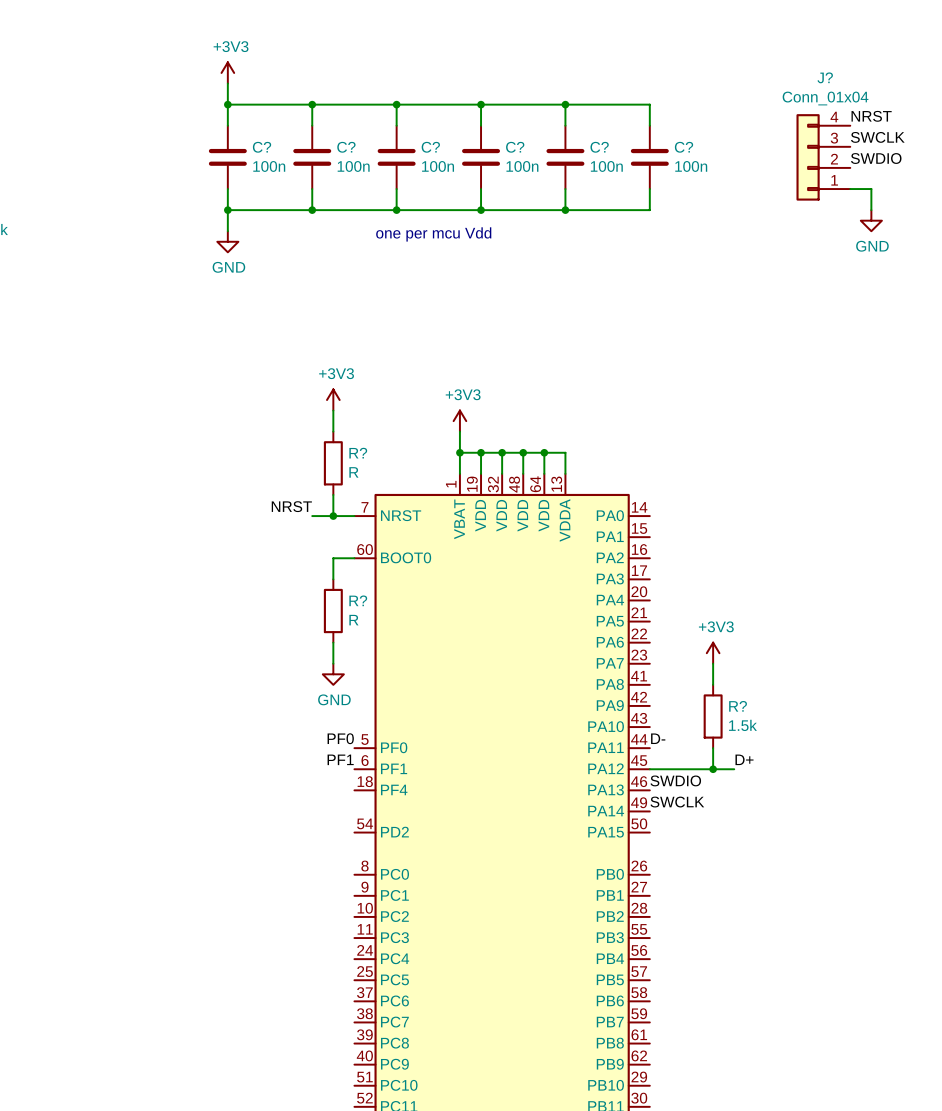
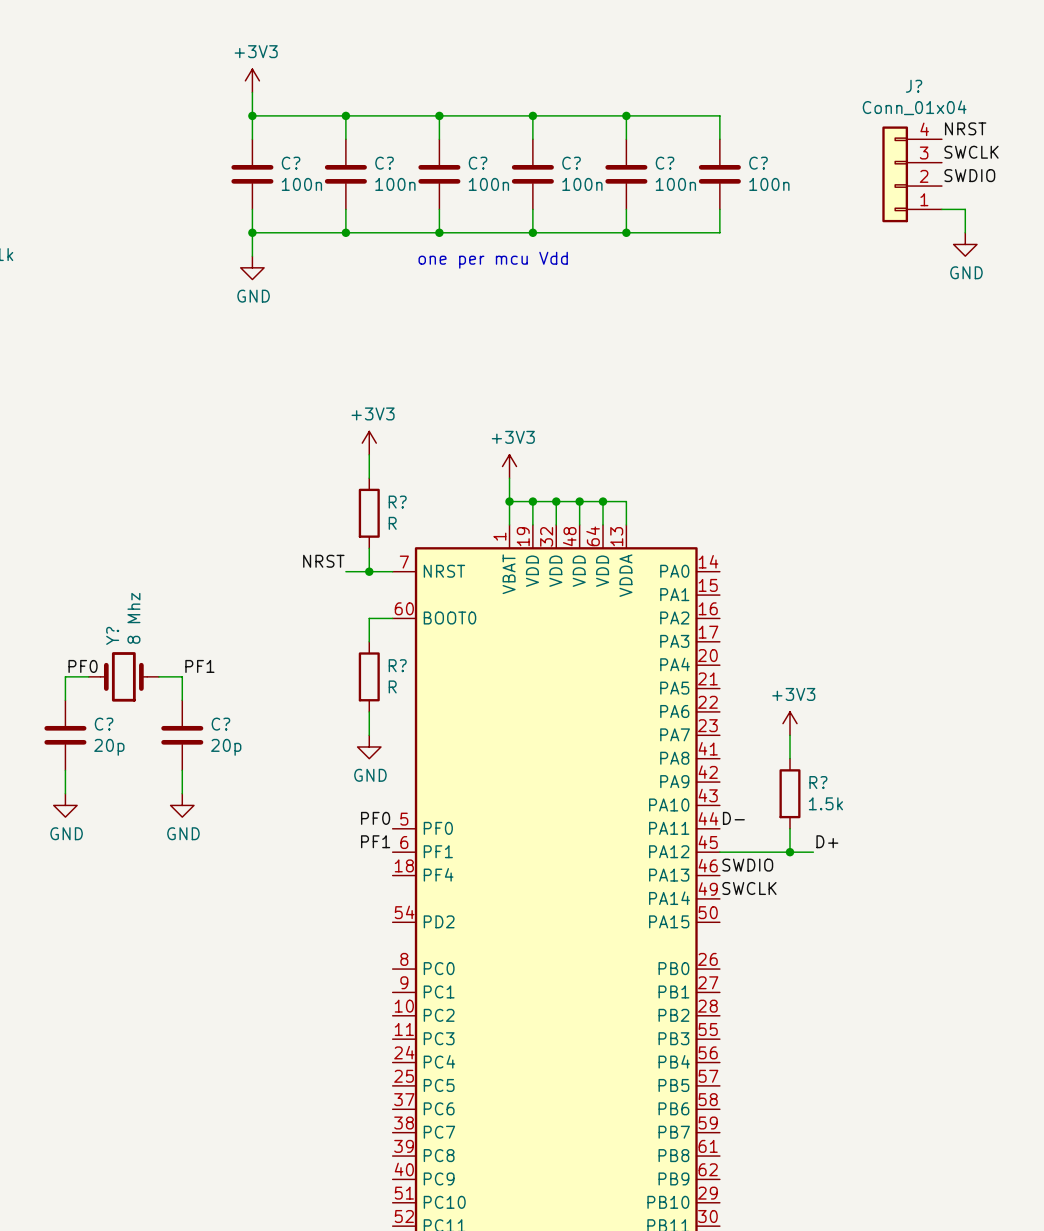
label: none -> PF0 (83, 666)
label: none -> PF1 (199, 666)
wire: none -> (88, 676) (65, 676) (65, 700)
Y?: none -> 8 Mhz (123, 676)
wire: none -> (158, 676) (182, 676) (182, 700)
C?: none -> 20p (65, 735)
C?: none -> 20p (182, 735)
wire: none -> (65, 770) (65, 793)
wire: none -> (182, 770) (182, 793)
power symbol: none -> GND (65, 805)
power symbol: none -> GND (182, 805)

